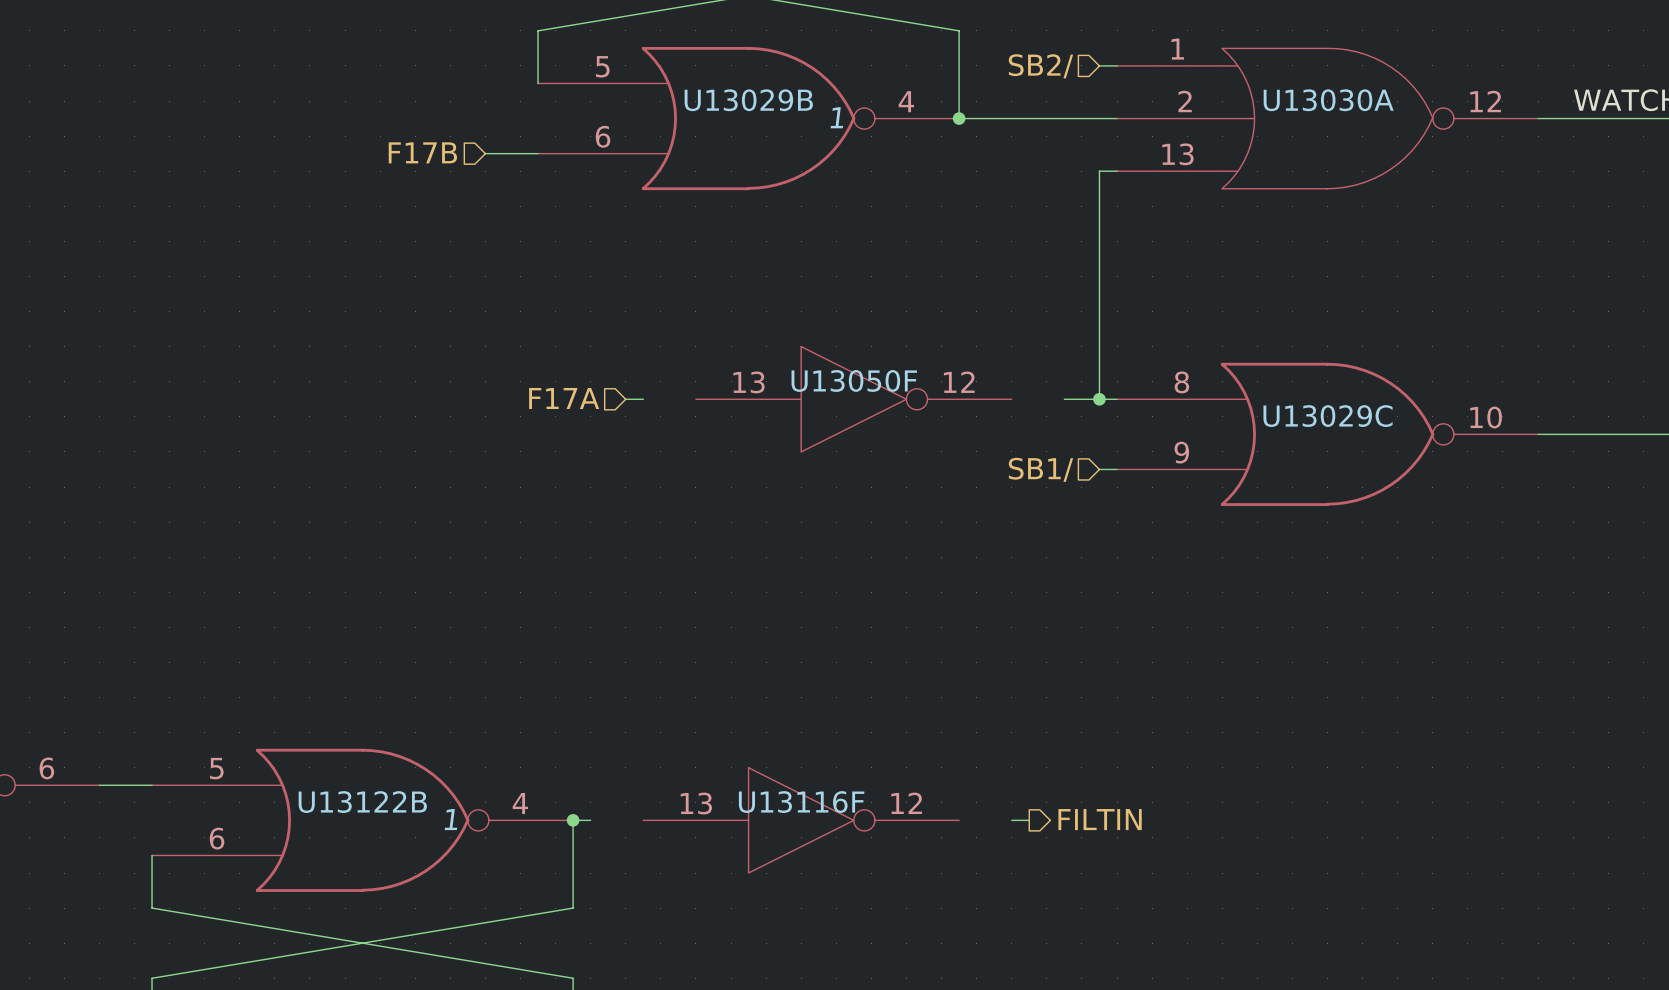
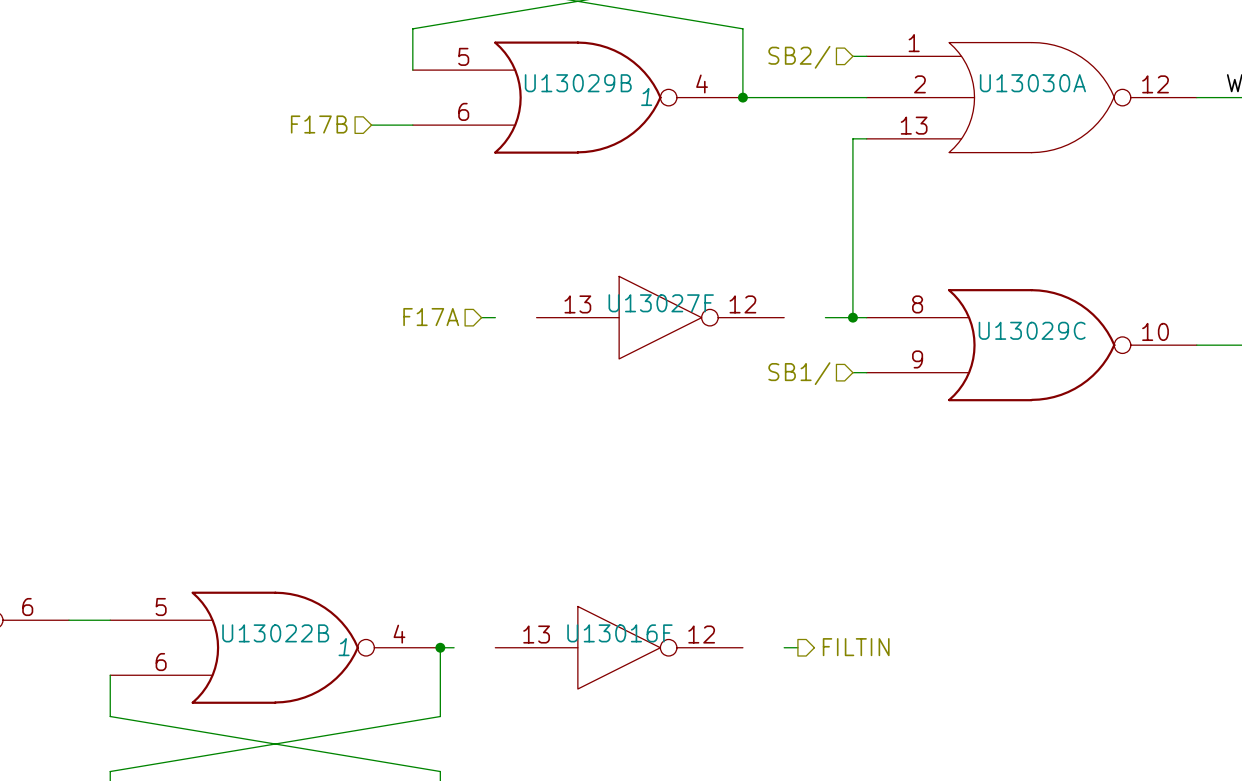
U13050F name: U13050F (854, 380) -> U13027F (661, 303)
U13122B name: U13122B (362, 802) -> U13022B (275, 633)
U13116F name: U13116F (801, 802) -> U13016F (619, 633)

